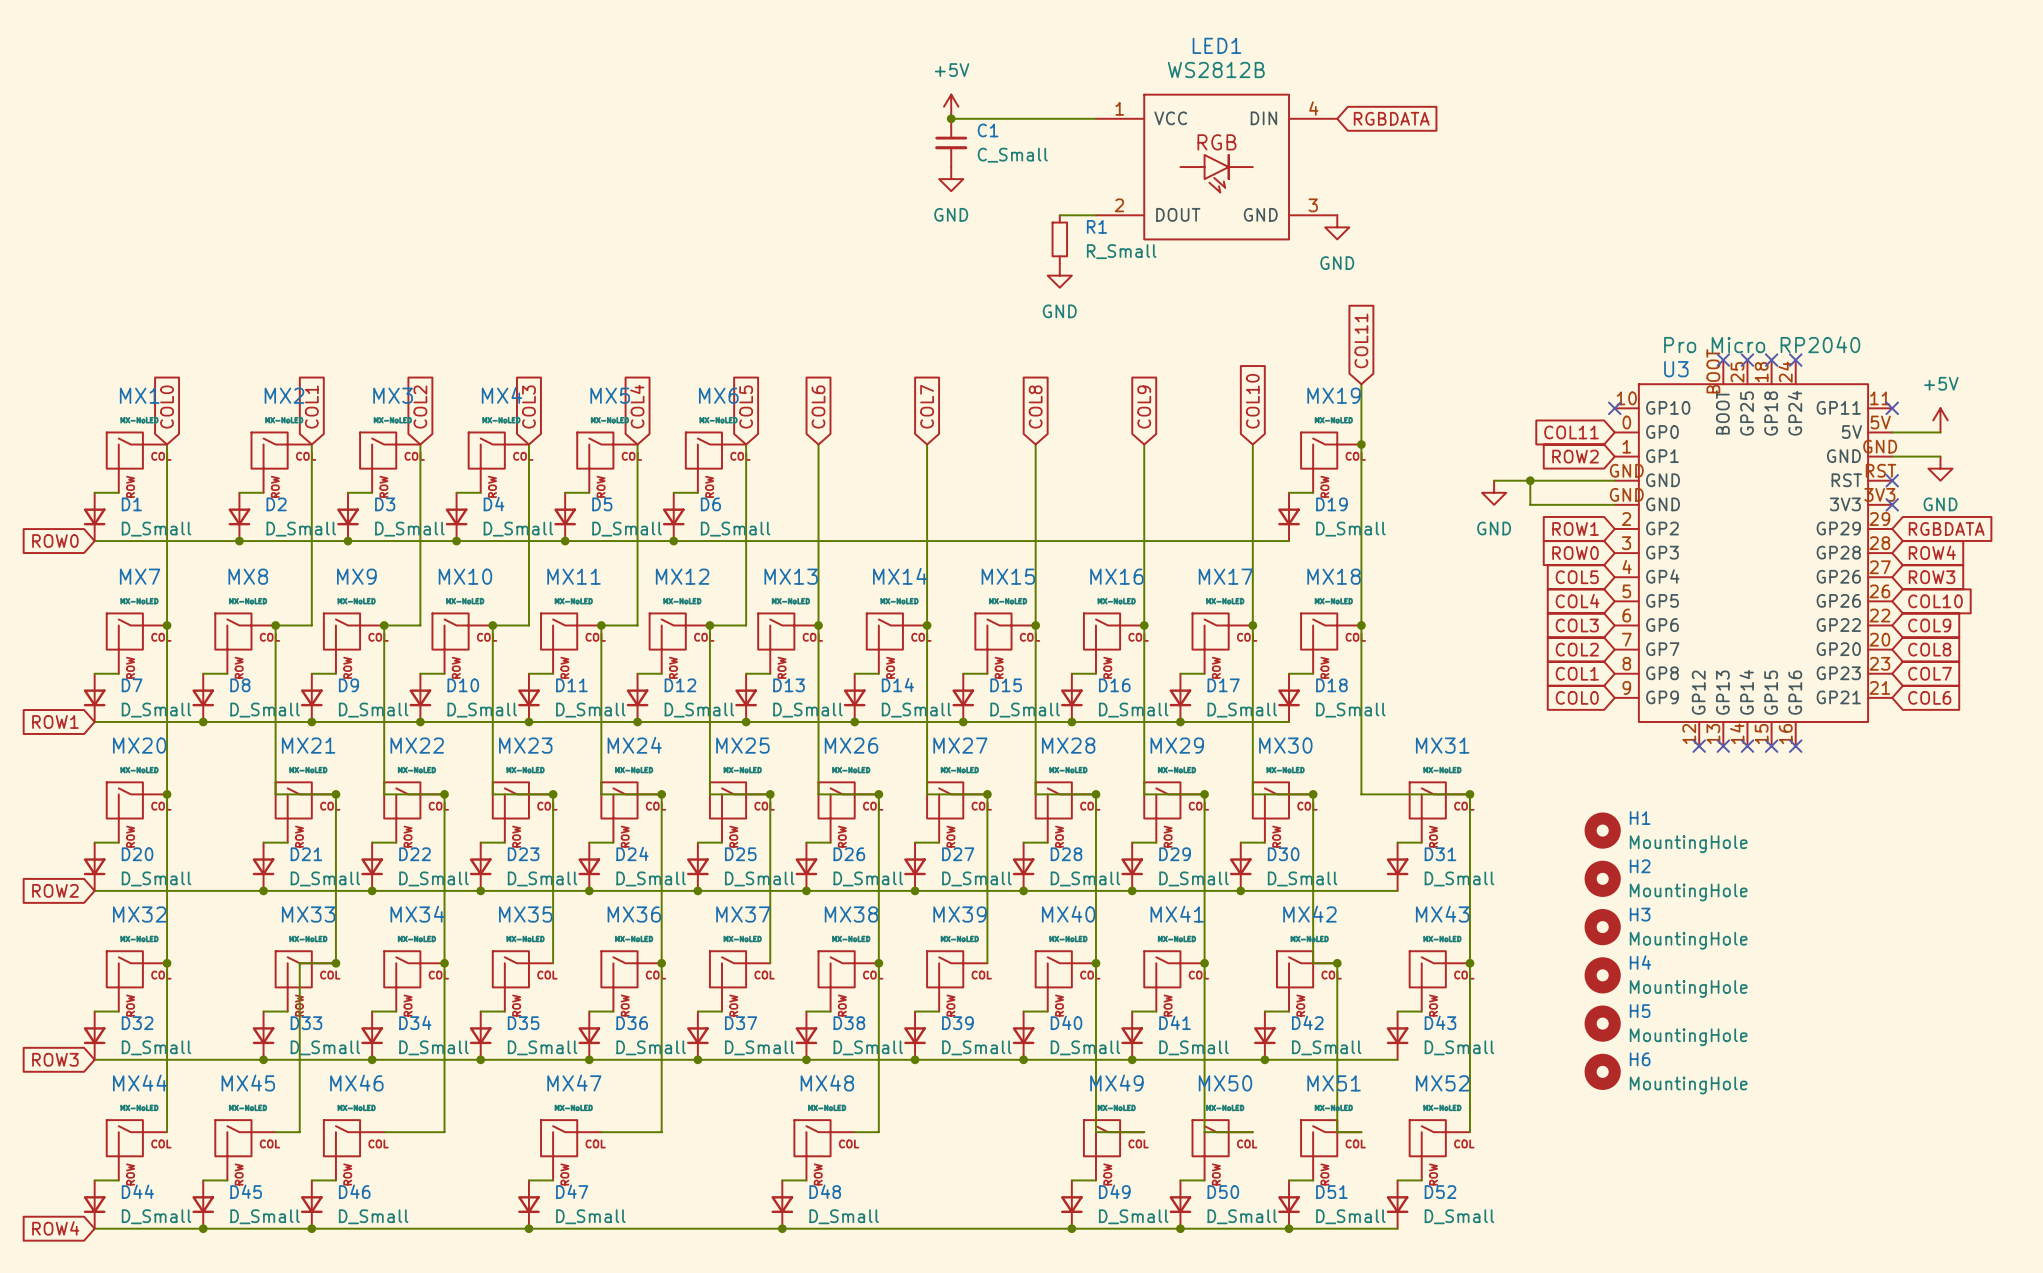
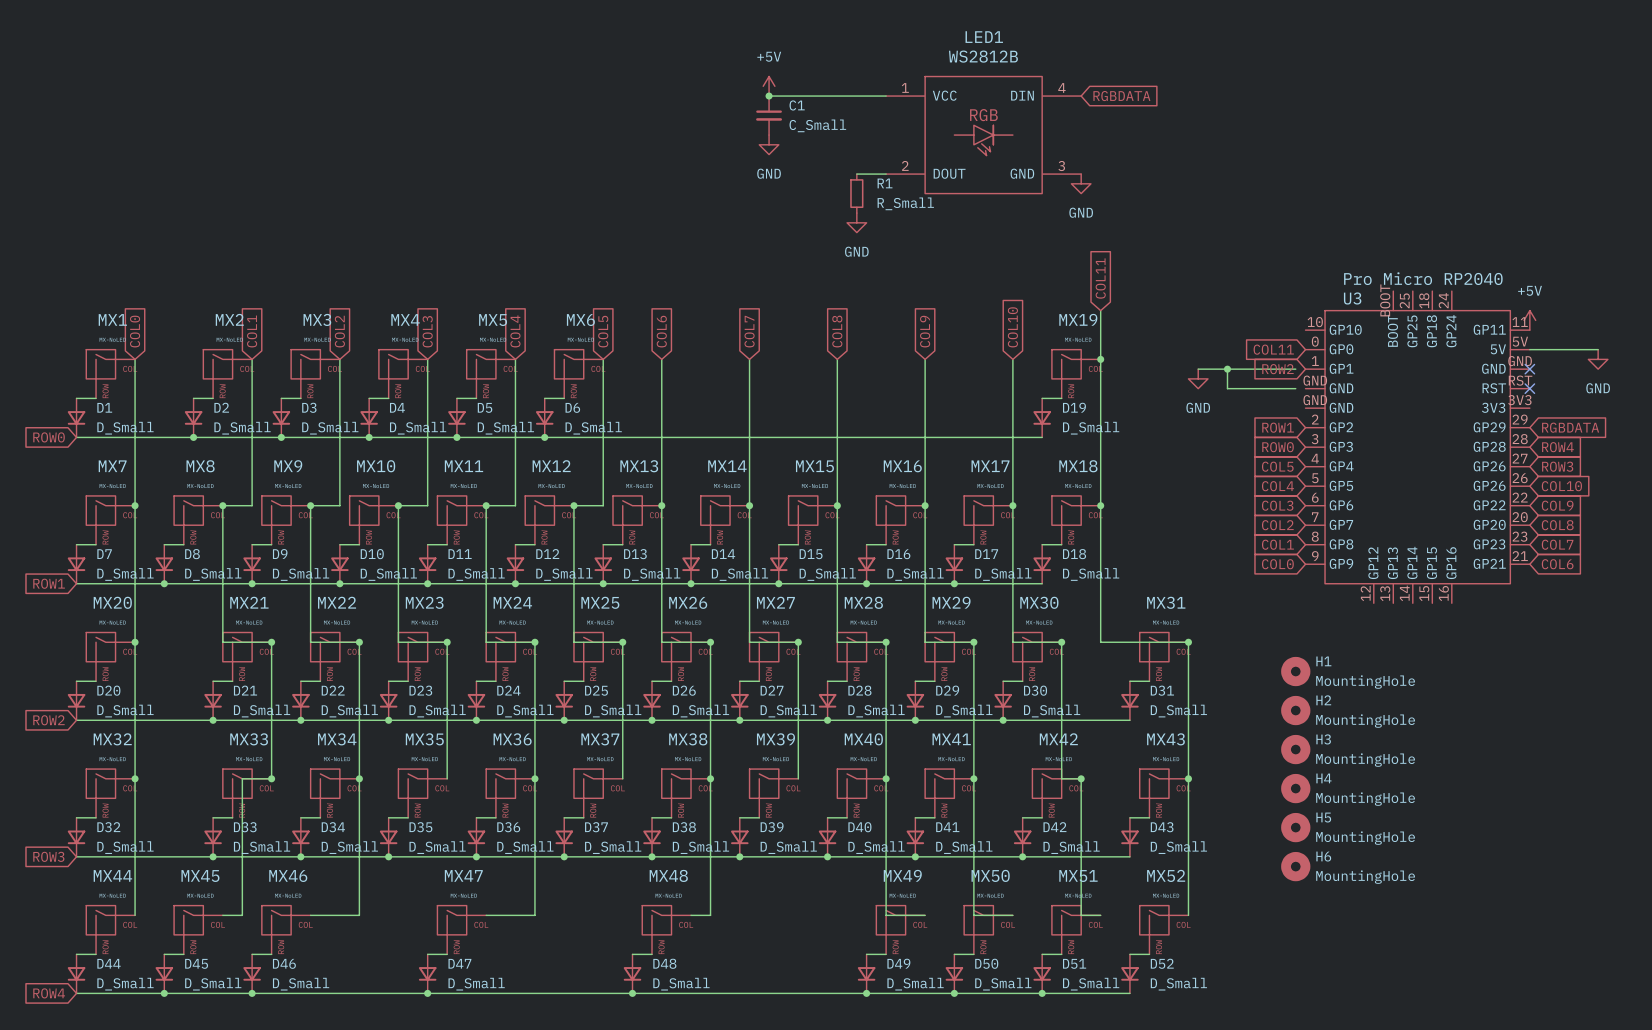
no-connect mark: (1723, 360) -> none
no-connect mark: (1747, 360) -> none
no-connect mark: (1771, 360) -> none
no-connect mark: (1795, 360) -> none
no-connect mark: (1614, 408) -> none
no-connect mark: (1892, 408) -> none
power symbol position: +5V (1940, 420) -> +5V (1529, 320)
wire: none -> (1568, 349) (1598, 349)
wire: none -> (1198, 369) (1295, 369)
wire: (1892, 456) (1940, 456) -> none
no-connect mark: none -> (1529, 369)
power symbol position: GND (1940, 468) -> GND (1598, 359)
wire: (1494, 480) (1518, 480) -> (1227, 369) (1227, 388)
wire: (1530, 480) (1530, 504) (1614, 504) -> none
junction position: (1530, 480) -> (1227, 369)
wire: (1602, 480) (1614, 480) -> none
power symbol position: GND (1494, 492) -> GND (1198, 378)
no-connect mark: (1892, 504) -> none
no-connect mark: (1699, 746) -> none
no-connect mark: (1723, 746) -> none
no-connect mark: (1747, 746) -> none
no-connect mark: (1771, 746) -> none
no-connect mark: (1795, 746) -> none

